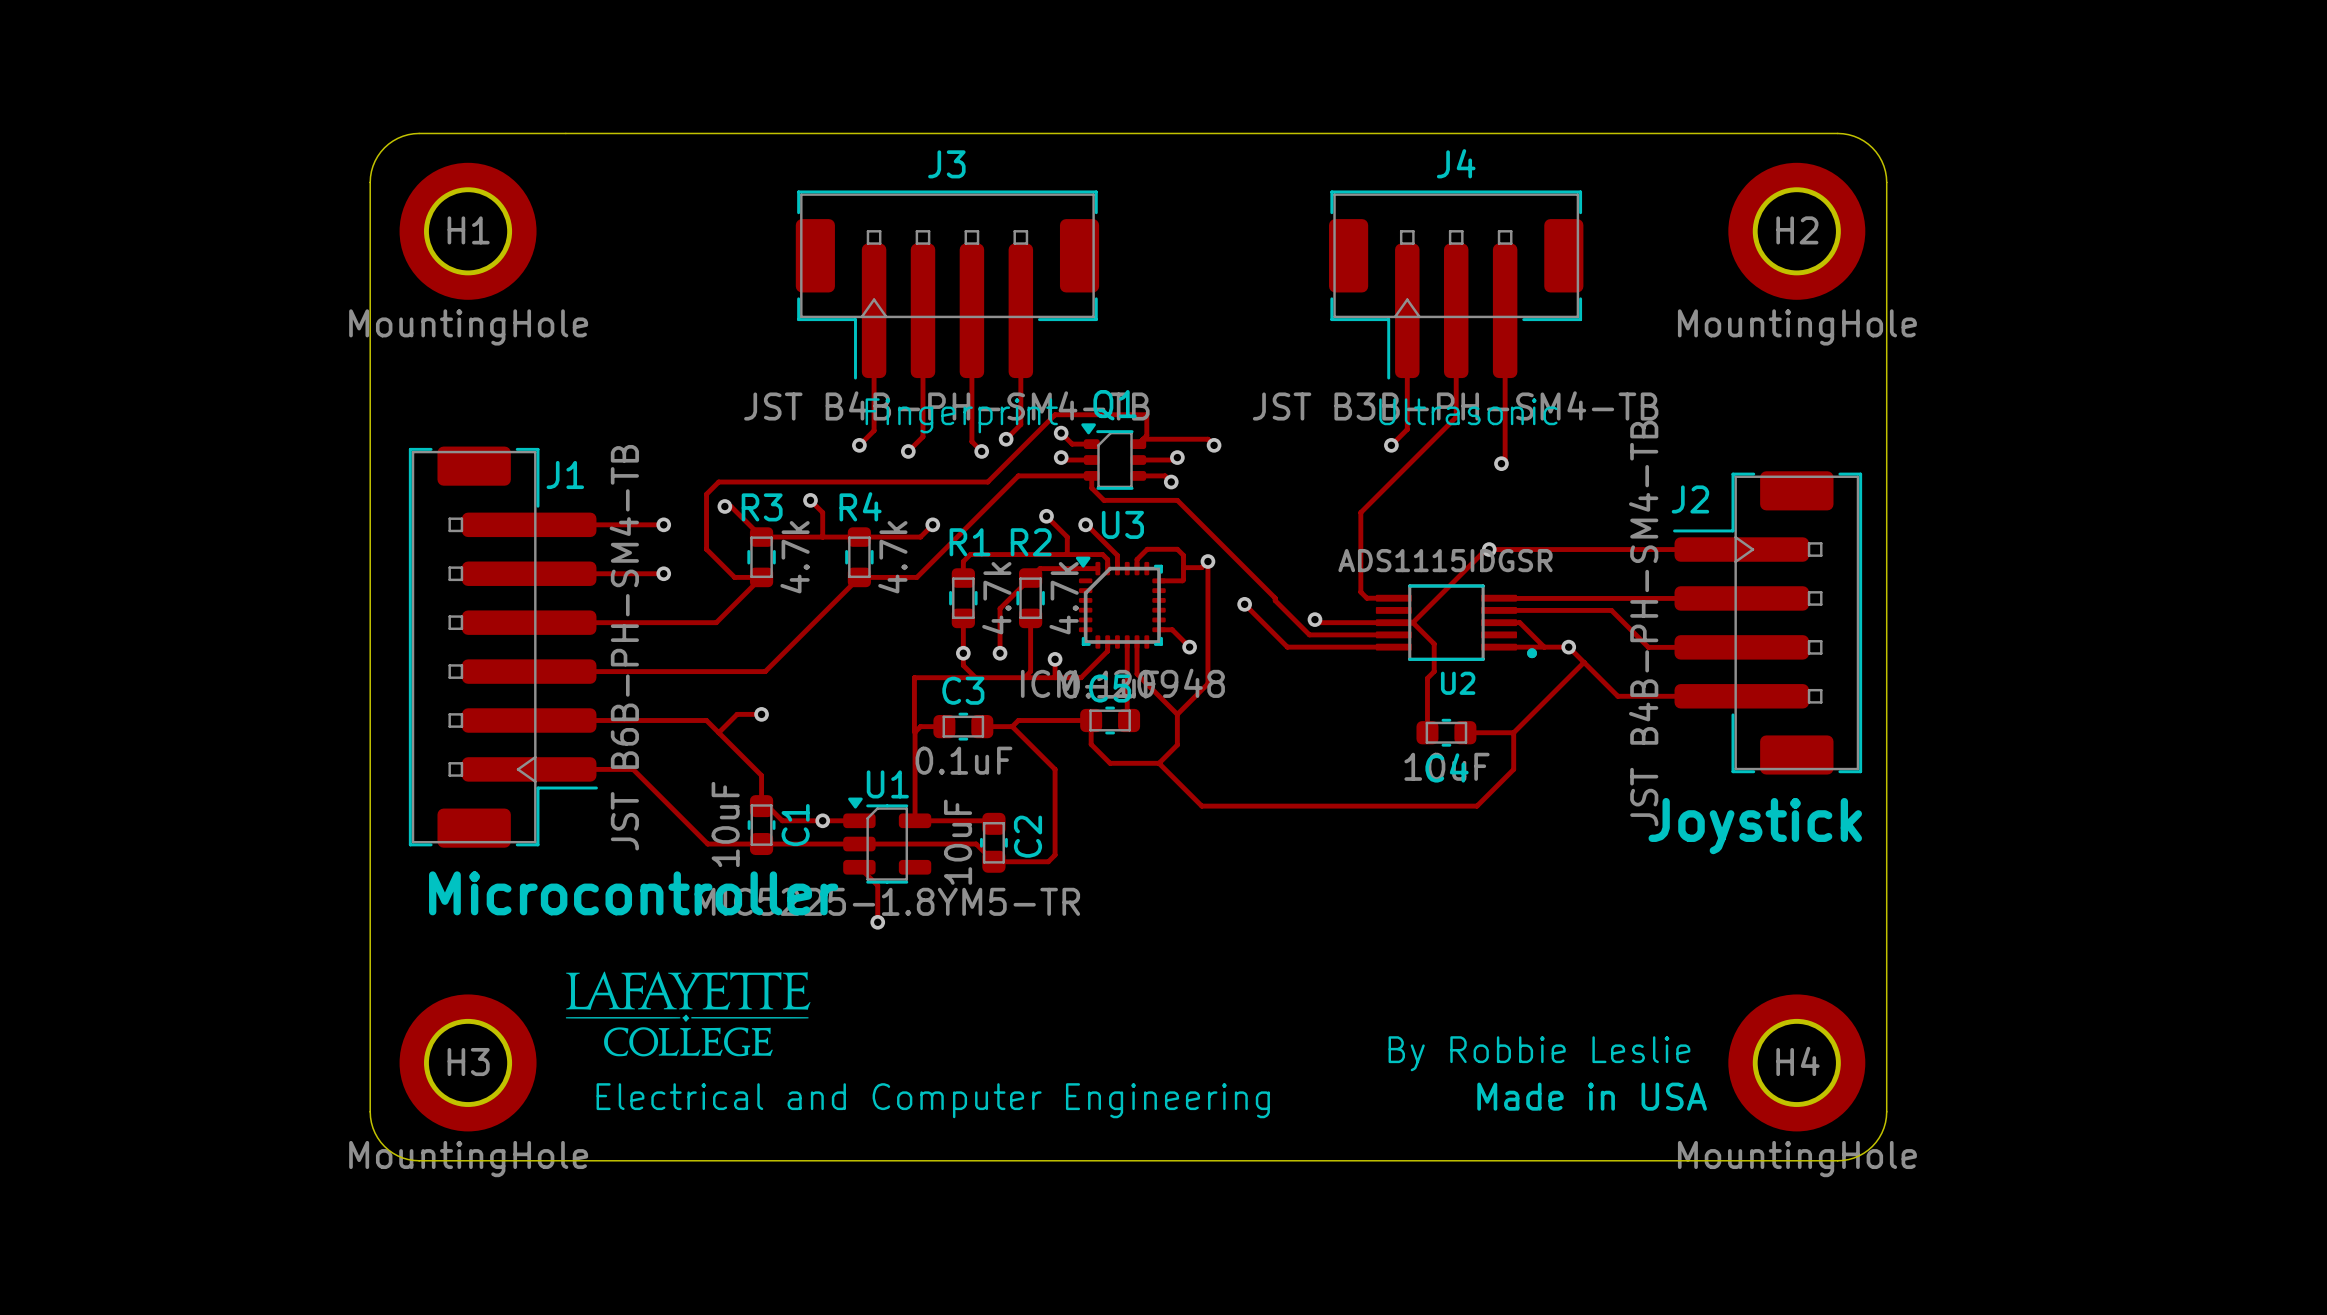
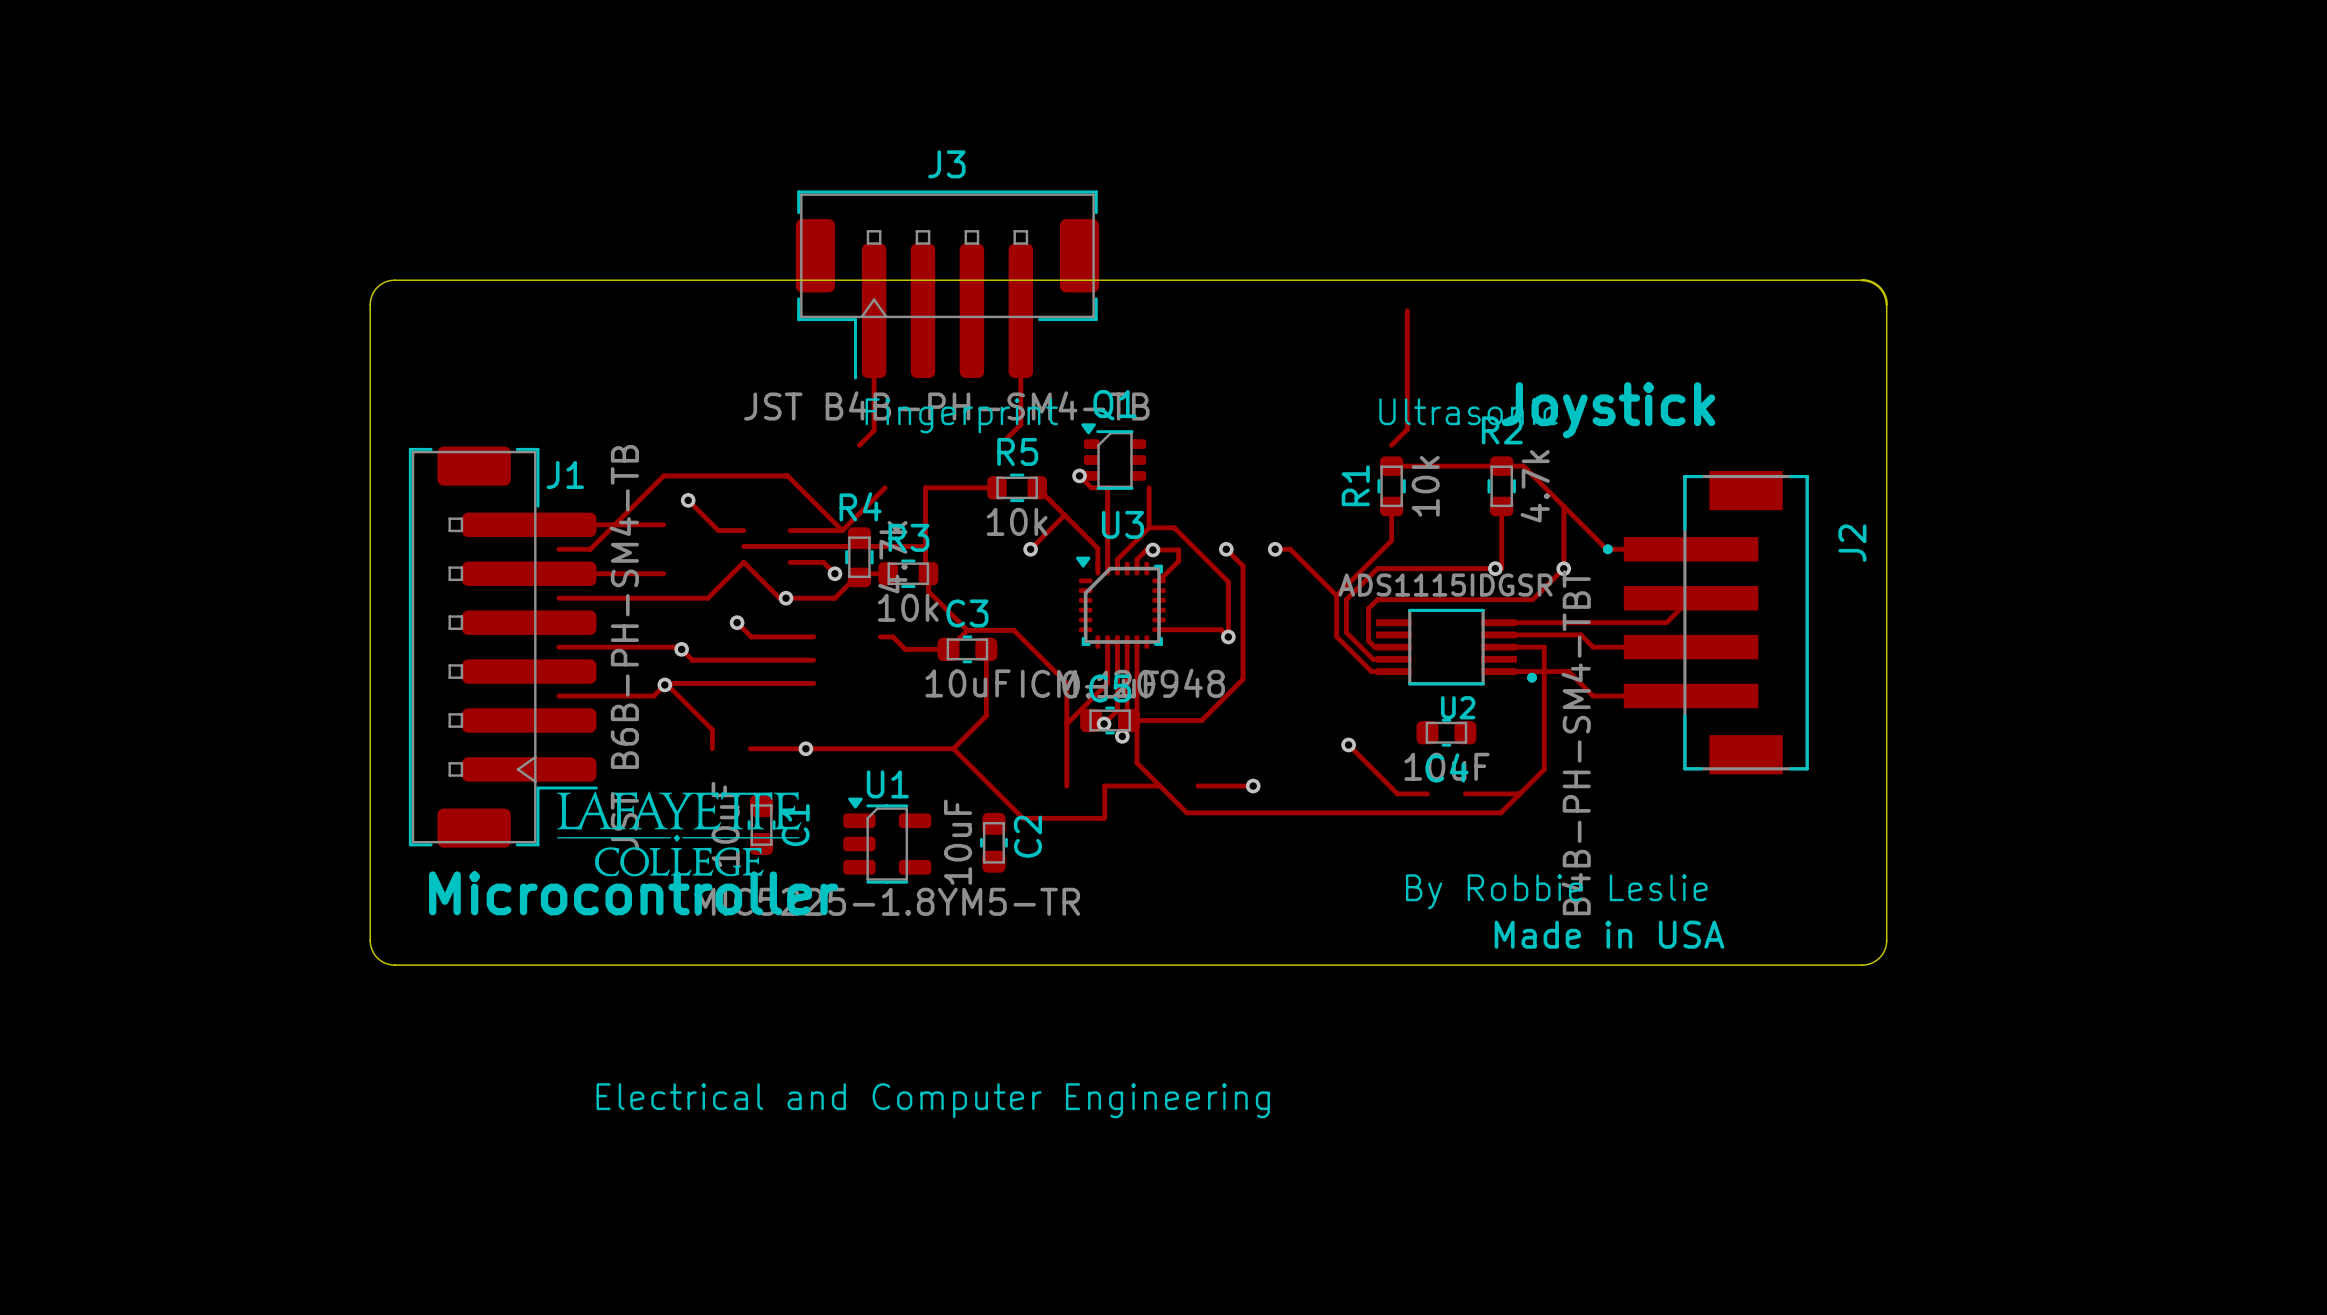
H1: MountingHole (468, 231) -> none
H2: MountingHole (1796, 231) -> none
J4: JST B3B-PH-SM4-TB (1456, 285) -> none
board edge: (370, 304) (371, 171) (377, 156) (388, 144) (402, 136) (419, 133) (1843, 133) (1859, 138) (1872, 147) (1881, 161) (1885, 171) (1886, 304) -> (370, 304) (372, 294) (377, 287) (386, 281) (394, 280) (1862, 280) (1872, 282) (1879, 287) (1885, 296) (1886, 304)
track: (923, 310) (923, 436) (908, 451) -> none
track: (971, 310) (971, 441) (981, 451) -> none
track: (1456, 310) (1456, 417) (1360, 512) (1360, 592) (1366, 598) (1393, 598) -> none
track: (1505, 310) (1505, 460) (1501, 463) -> none
track: (1061, 433) (1072, 444) (1091, 444) -> none
via: (1061, 433) -> none
via: (1006, 439) -> none
track: (1143, 439) (1207, 439) (1214, 445) -> none
track: (1138, 444) (1146, 435) (1146, 414) (1055, 414) (987, 482) (718, 482) (706, 494) (706, 549) (734, 577) (761, 577) (716, 622) (529, 622) -> none
via: (859, 445) -> none
via: (1214, 445) -> none
via: (1391, 445) -> none
via: (908, 451) -> none
via: (981, 451) -> none
track: (1061, 457) (1063, 460) (1091, 460) -> none
via: (1061, 457) -> none
track: (1177, 457) (1174, 460) (1138, 460) -> none
via: (1177, 457) -> none
via: (1501, 463) -> none
track: none -> (1391, 466) (1523, 466) (1606, 549) (1691, 549)
J2 footprint: [1673, 471, 1863, 775] -> [1602, 471, 1809, 775]
via: none -> (1079, 475)
track: (1138, 475) (1165, 475) (1171, 482) -> none
via: (1171, 482) -> none
track: none -> (885, 487) (842, 530)
track: none -> (996, 487) (925, 487) (925, 570) (928, 573) (928, 591) (967, 630)
R5: none -> 10k (1017, 487)
track: none -> (1149, 487) (1149, 527)
J2 name position: J2 (1690, 499) -> J2 (1852, 543)
track: none -> (688, 500) (718, 530) (743, 530)
via: none -> (688, 500)
track: (810, 500) (822, 512) (822, 537) -> none
via: (810, 500) -> none
track: (724, 506) (730, 506) (761, 537) (920, 537) (932, 524) -> none
via: (724, 506) -> none
track: none -> (1391, 506) (1391, 540) (1336, 595)
track: none -> (1501, 506) (1501, 568) (1377, 568) (1346, 599) (1346, 632) (1373, 659) (1393, 659)
track: none -> (1064, 515) (1030, 549)
track: (1046, 516) (1067, 537) (1067, 554) -> none
via: (1046, 516) -> none
via: (663, 524) -> none
via: (932, 524) -> none
track: (1085, 524) (1117, 555) (1117, 559) -> (1149, 527) (1117, 559)
via: (1085, 524) -> none
track: none -> (790, 530) (842, 530)
track: none -> (842, 530) (787, 475) (663, 475) (590, 549) (558, 549)
R1 name rotation: 0° (970, 542) -> 90° counterclockwise (1355, 485)
R1 name position: R1 (970, 542) -> R1 (1355, 485)
track: none -> (743, 546) (922, 546) (925, 549)
via: none -> (1030, 549)
track: (1146, 549) (1177, 549) (1183, 555) (1183, 579) (1159, 580) -> (1146, 549) (1178, 549) (1178, 561) (1159, 580)
via: none -> (1152, 549)
track: (1226, 549) (1177, 500) (1104, 500) (1091, 488) (1091, 475) (1018, 475) (916, 577) (859, 577) (765, 671) (529, 671) -> none
track: none -> (1275, 549) (1290, 549) (1336, 595)
via: none -> (1275, 549)
via position: (1489, 549) -> (1495, 568)
track: (1741, 549) (1486, 549) (1412, 622) -> none
R3 rotation: 0° (761, 557) -> 90° clockwise (908, 573)
R3 position: (761, 557) -> (908, 573)
R3 value: 4.7k (795, 557) -> 10k (908, 607)
track: (1107, 559) (1102, 554) (970, 554) (963, 561) (963, 578) -> (1107, 559) (1108, 487) (1091, 487) (1079, 475)
via position: (1207, 561) -> (1226, 549)
track: none -> (790, 562) (823, 562) (834, 573)
track: (1243, 566) (1309, 634) (1393, 634) -> (1243, 566) (1243, 679) (1201, 720) (1137, 720)
track: (1183, 567) (1201, 567) (1207, 561) (1207, 683) (1177, 714) -> none
track: (1097, 568) (1040, 568) (1000, 608) (1000, 653) -> (1097, 568) (1097, 548) (1037, 487)
via: none -> (1563, 568)
via: (663, 573) -> none
via: none -> (834, 573)
track: none -> (888, 573) (859, 573) (834, 598) (779, 598) (743, 562) (707, 598) (558, 598)
track: none -> (1336, 595) (1336, 636) (1371, 671) (1393, 671)
via: none -> (786, 598)
R1 position: (963, 598) -> (1391, 486)
R1 value: 4.7k (996, 598) -> 10k (1425, 486)
R2 position: (1030, 598) -> (1501, 486)
track: (1499, 598) (1741, 598) -> none
track: (1244, 604) (1287, 647) (1374, 647) -> (1563, 506) (1563, 568) (1532, 599) (1377, 599) (1368, 608) (1368, 640) (1374, 647)
via: (1244, 604) -> none
track: (1499, 610) (1611, 610) (1648, 647) (1741, 647) -> none
track: (1311, 616) (1318, 622) (1412, 622) -> none
track: (963, 618) (963, 665) (975, 677) -> none
track: (1030, 618) (1030, 671) (1024, 677) -> none
via: (1314, 619) -> none
track: none -> (737, 622) (751, 636) (813, 636)
via: none -> (737, 622)
track: (1412, 622) (1434, 643) (1434, 671) (1427, 678) (1427, 732) -> none
U2 position: (1456, 622) -> (1456, 647)
track: (1519, 622) (1544, 647) (1568, 647) (1617, 696) (1741, 696) -> (1519, 622) (1666, 622) (1691, 598)
J2 value: JST B4B-PH-SM4-TB (1643, 623) -> B4B-PH-SM4-TBT (1576, 742)
track: (1172, 629) (1189, 647) -> (1172, 629) (1221, 629) (1228, 636) (1228, 581) (1174, 527) (1149, 527)
track: none -> (967, 630) (1013, 630) (1066, 683) (1066, 786)
track: none -> (967, 630) (948, 649) (905, 649) (892, 636) (880, 636)
track: none -> (1499, 634) (1580, 634) (1593, 647) (1691, 647)
via: none -> (1228, 636)
track: none -> (1117, 641) (1117, 710) (1104, 723)
track: none -> (558, 647) (679, 647) (692, 660) (813, 660)
via: (1189, 647) -> none
via: (1568, 647) -> none
via: none -> (681, 649)
track: none -> (986, 649) (986, 715) (953, 748)
track: (1107, 651) (1081, 677) (914, 677) (915, 732) -> (1107, 651) (1107, 683) (1066, 723)
via: (963, 653) -> none
via: (1000, 653) -> none
track: (1055, 659) (1055, 677) -> none
via: (1055, 659) -> none
track: (1584, 662) (1513, 732) -> none
track: none -> (1499, 671) (1568, 671) (1593, 696) (1691, 696)
track: (1137, 674) (1177, 714) -> (1137, 674) (1137, 763) (1186, 812) (1500, 812) (1544, 769) (1544, 647)
track: none -> (666, 683) (712, 729) (712, 748)
track: none -> (813, 683) (666, 683) (653, 696) (558, 696)
via: none -> (664, 684)
track: (761, 714) (737, 714) (718, 732) -> none
via: (761, 714) -> none
track: (1177, 714) (1177, 744) (1159, 763) -> none
track: (529, 720) (706, 720) (761, 775) (761, 806) (767, 806) (782, 820) (859, 820) -> none
via: none -> (1104, 723)
track: (944, 726) (920, 726) (915, 732) -> none
C3 position: (963, 726) -> (967, 649)
track: (982, 726) (1012, 726) -> none
track: (1012, 726) (1018, 720) (1091, 720) (1091, 744) (1110, 763) (1159, 763) -> none
track: (1012, 726) (1055, 769) (1055, 855) (1048, 861) (993, 861) (976, 844) (707, 844) (633, 769) (529, 769) -> none
track: (915, 732) (915, 820) (990, 820) (993, 823) -> none
track: (1465, 732) (1513, 732) -> none
track: (1513, 732) (1513, 769) (1477, 806) (1201, 806) (1159, 763) -> none
via: none -> (1122, 736)
track: none -> (1348, 744) (1397, 793) (1427, 793)
via: none -> (1348, 744)
track: none -> (750, 748) (953, 748)
via: none -> (805, 748)
track: none -> (953, 748) (1022, 818) (1104, 818) (1104, 786) (1160, 786)
C3 value: 0.1uF (963, 760) -> 10uF (968, 683)
track: none -> (1197, 786) (1253, 786)
via: none -> (1253, 786)
track: none -> (1465, 793) (1519, 793)
via: (822, 820) -> none
text position: Joystick (1755, 826) -> Joystick (1608, 410)
track: (859, 867) (877, 885) (877, 922) -> none
via: (877, 922) -> none
board edge: (370, 940) (371, 1122) (377, 1137) (388, 1150) (402, 1158) (419, 1160) (1843, 1160) (1859, 1155) (1872, 1146) (1879, 1137) (1885, 1122) (1886, 940) -> (370, 940) (372, 951) (377, 957) (384, 962) (394, 965) (1862, 965) (1870, 963) (1879, 957) (1884, 951) (1886, 940)
drawing position: (688, 1014) -> (679, 833)
text position: By Robbie Leslie (1539, 1053) -> By Robbie Leslie (1556, 891)
H3: MountingHole (468, 1062) -> none
H4: MountingHole (1796, 1062) -> none
text position: Made in USA (1592, 1096) -> Made in USA (1609, 934)

